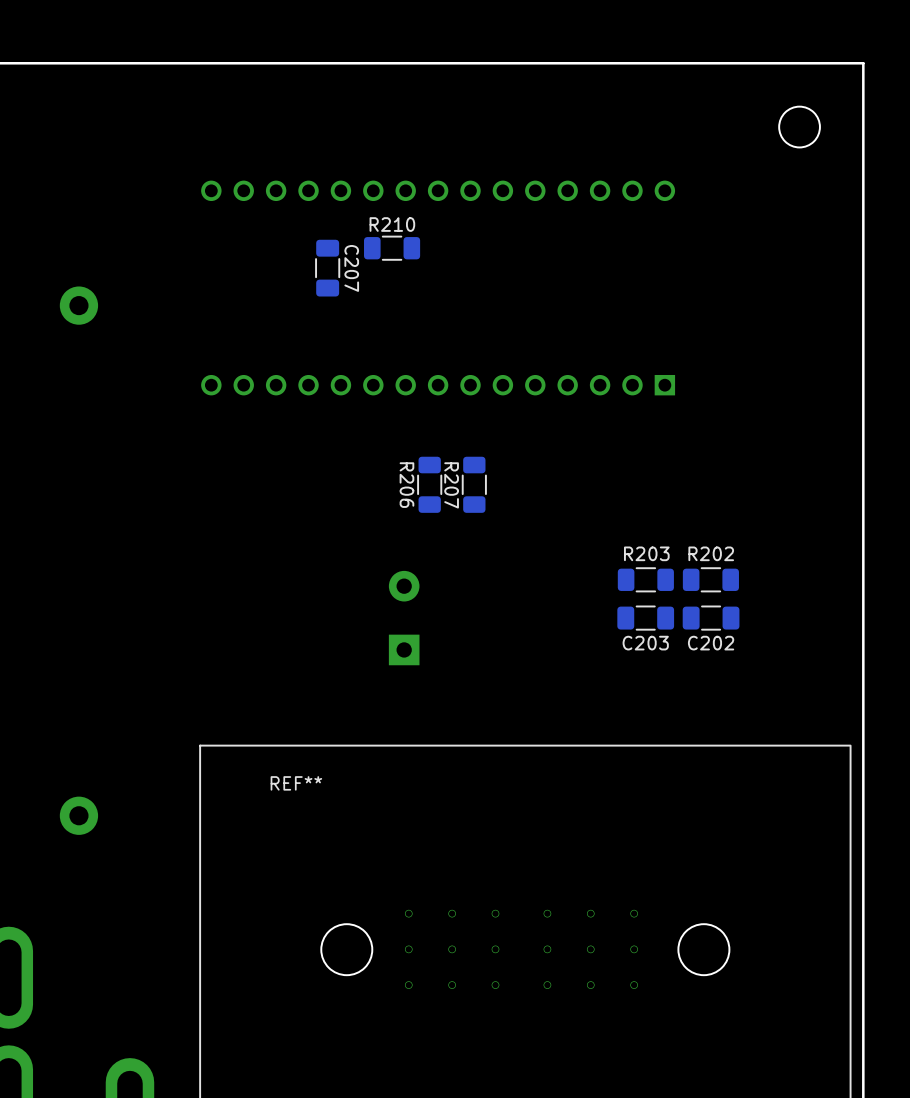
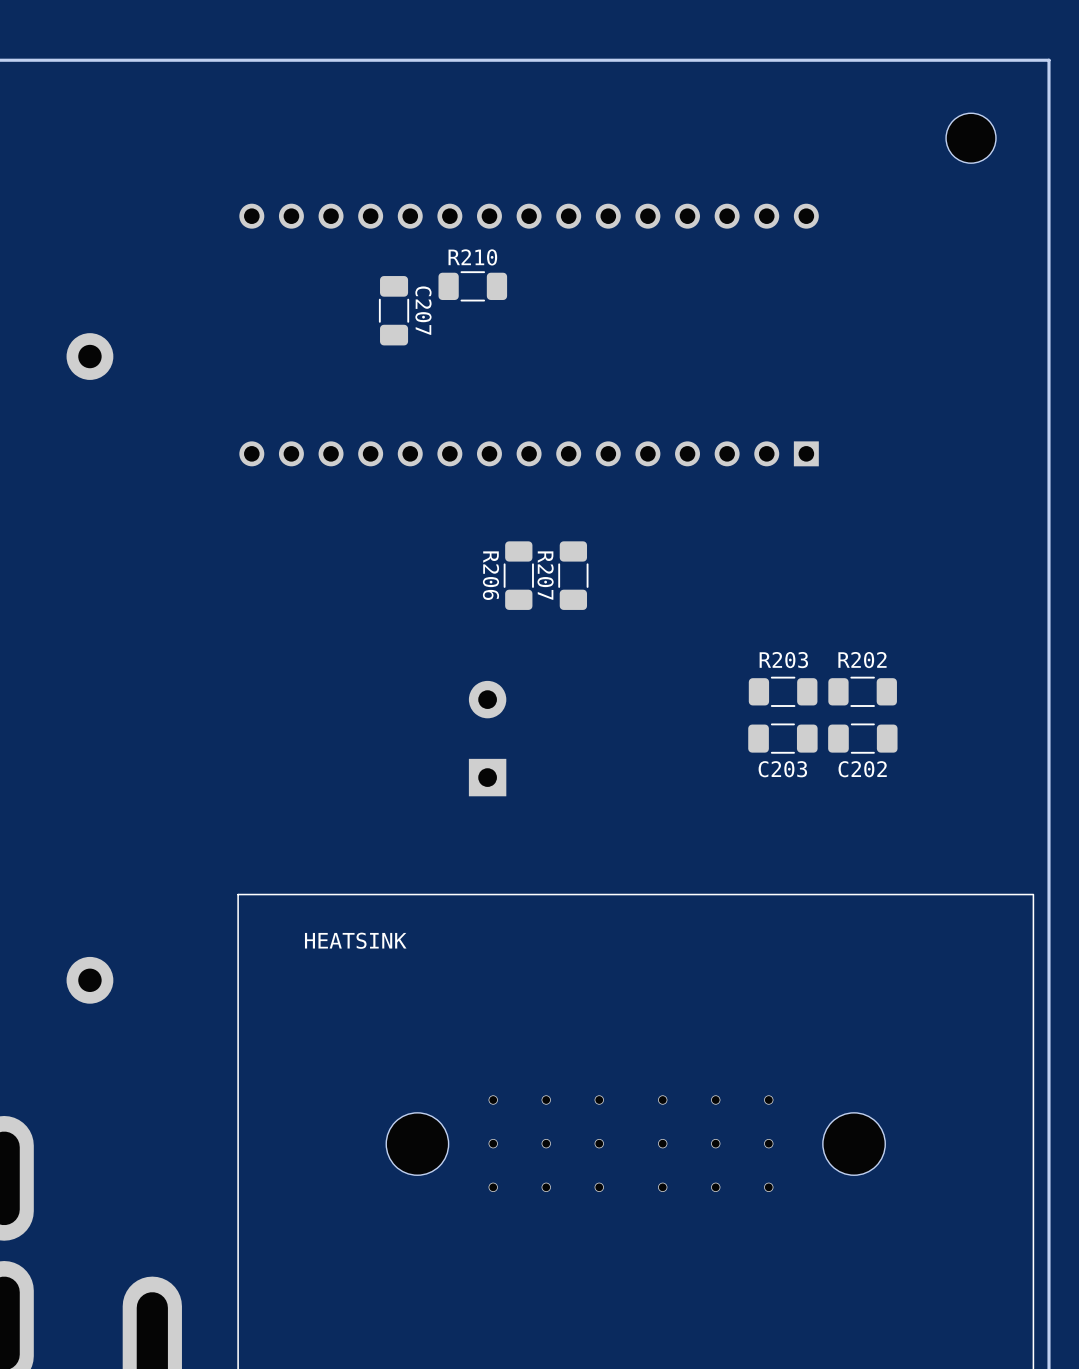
REF** name: REF** (296, 783) -> HEATSINK (355, 940)

